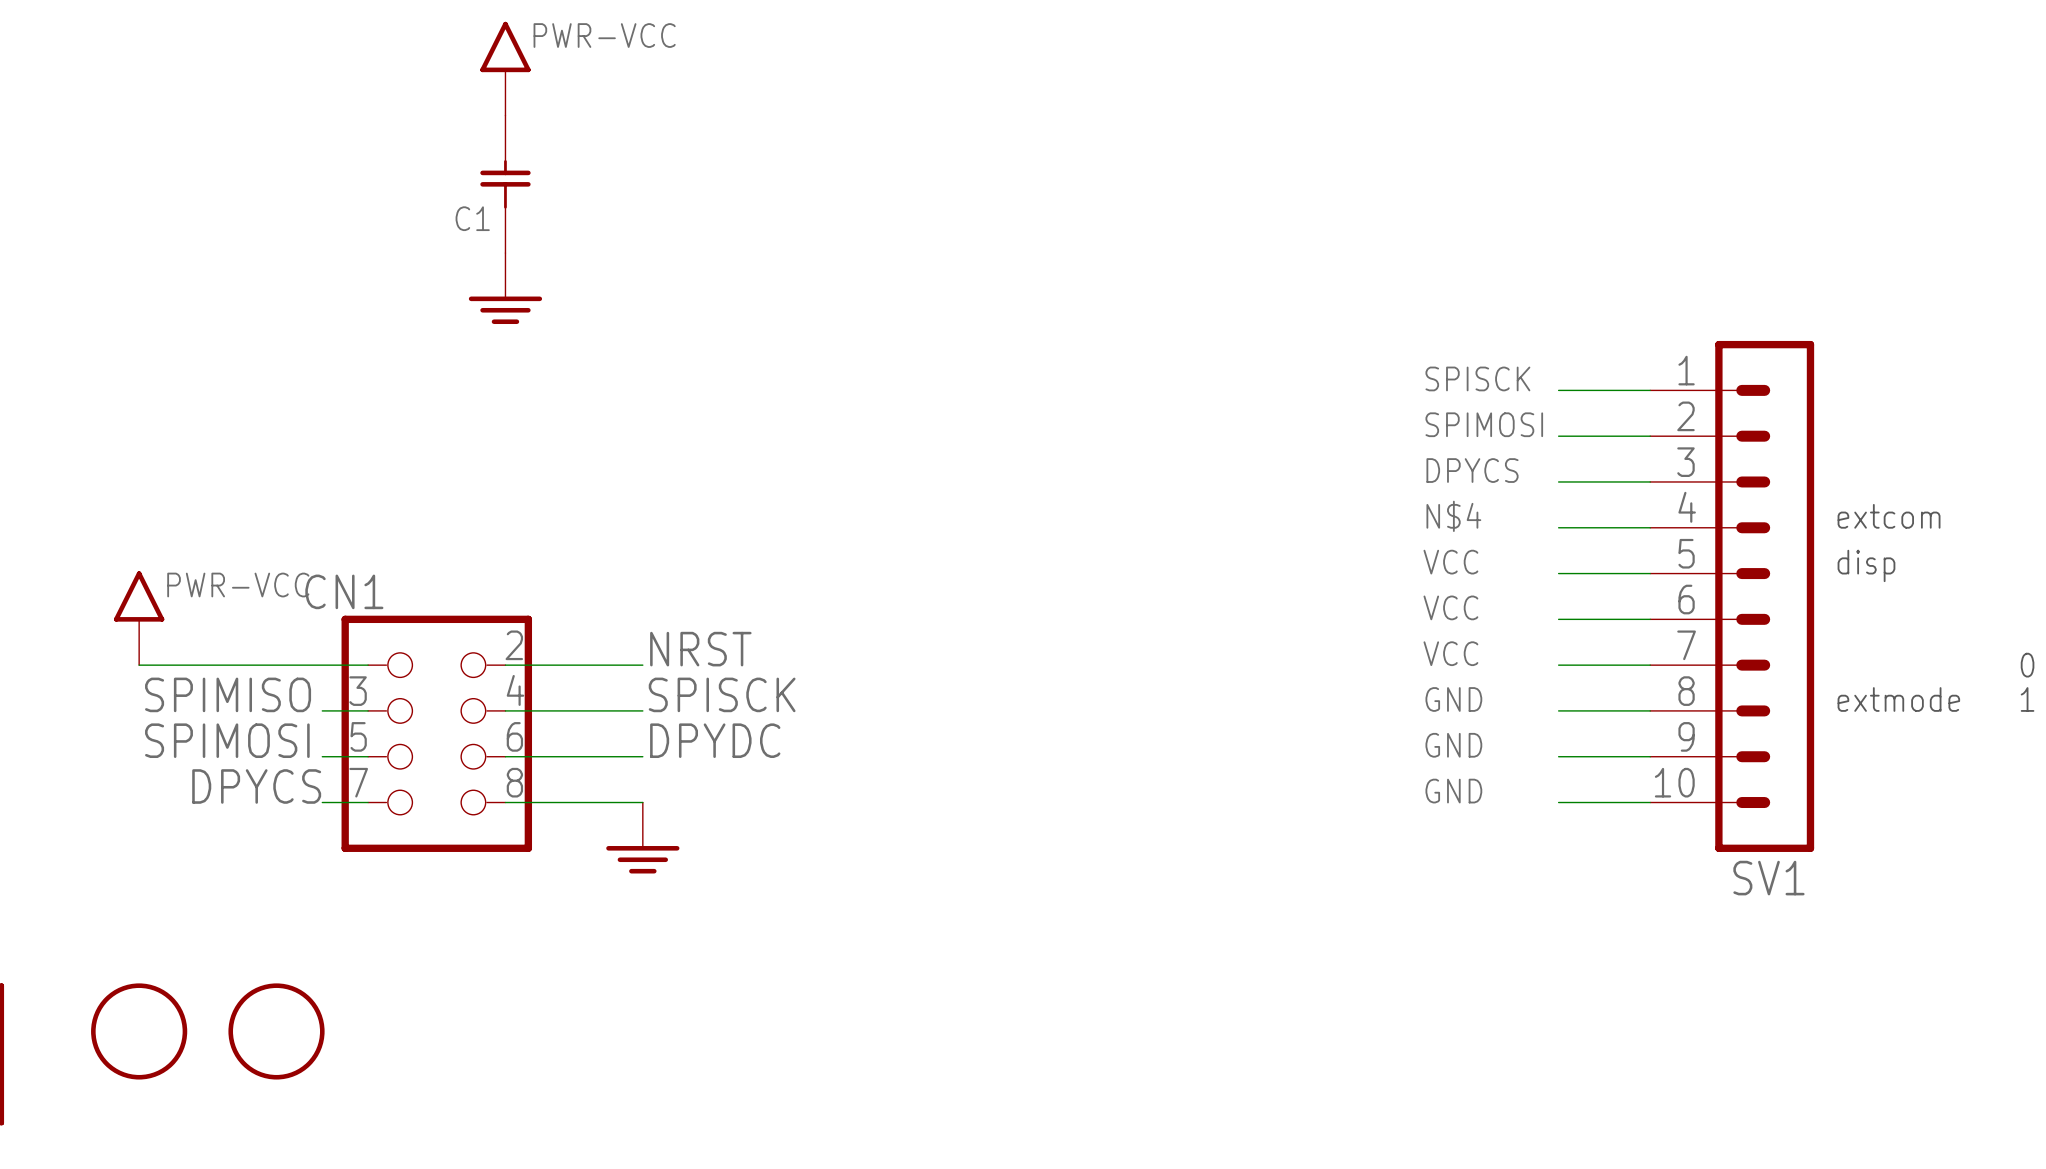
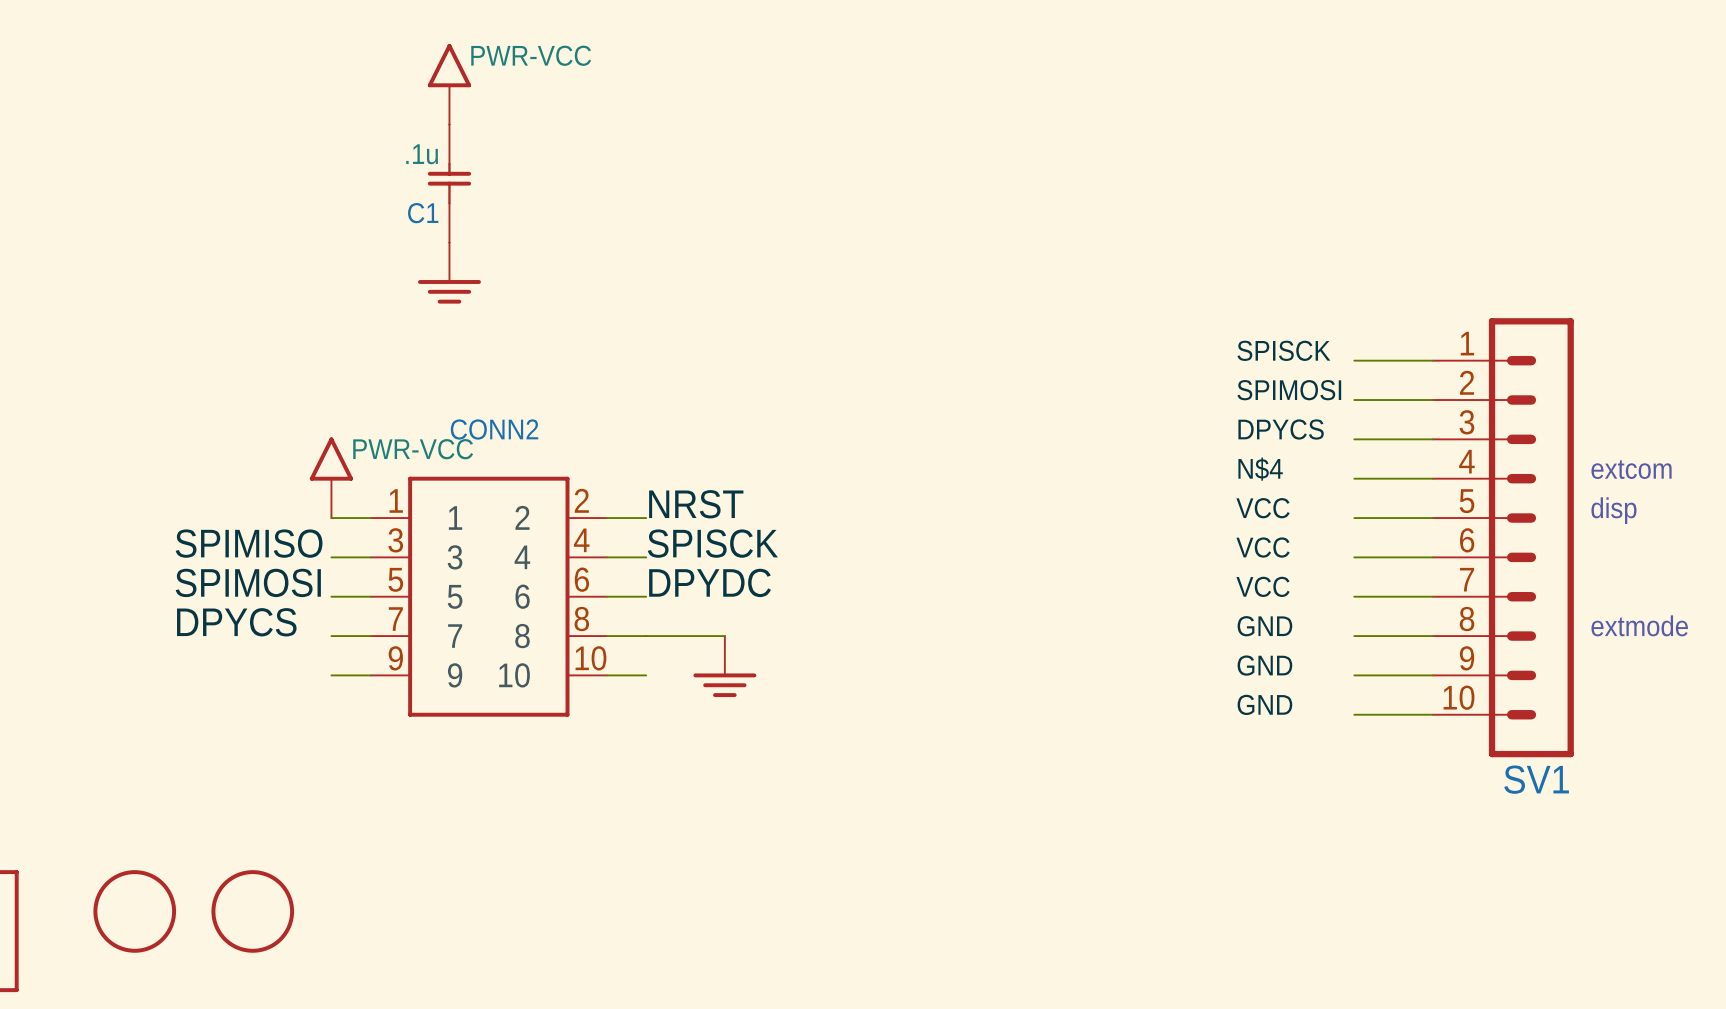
C1 value: none -> .1u (422, 154)
wire: none -> (331, 518) (370, 518)
wire: none -> (606, 518) (646, 518)
power symbol position: PWR-VCC (139, 618) -> PWR-VCC (331, 477)
wire: none -> (606, 557) (646, 557)
label position: NRST (700, 649) -> NRST (696, 504)
wire: (139, 665) (368, 665) -> (370, 596) (331, 596)
wire: (505, 665) (642, 665) -> none
CONN2: none -> (488, 596)
label position: SPIMISO (228, 694) -> SPIMISO (249, 543)
label position: SPISCK (722, 694) -> SPISCK (712, 543)
wire: (322, 710) (368, 710) -> (370, 636) (331, 636)
wire: (505, 710) (642, 710) -> (606, 636) (724, 636)
CN1: (436, 733) -> none
label position: SPIMOSI (227, 740) -> SPIMOSI (248, 582)
label position: DPYDC (715, 740) -> DPYDC (710, 582)
wire: (322, 756) (368, 756) -> (370, 675) (331, 675)
wire: (505, 756) (642, 756) -> none
wire: none -> (606, 675) (646, 675)
label position: DPYCS (256, 786) -> DPYCS (236, 622)
wire: (322, 802) (368, 802) -> (606, 596) (646, 596)
power symbol position: (642, 838) -> (724, 666)

